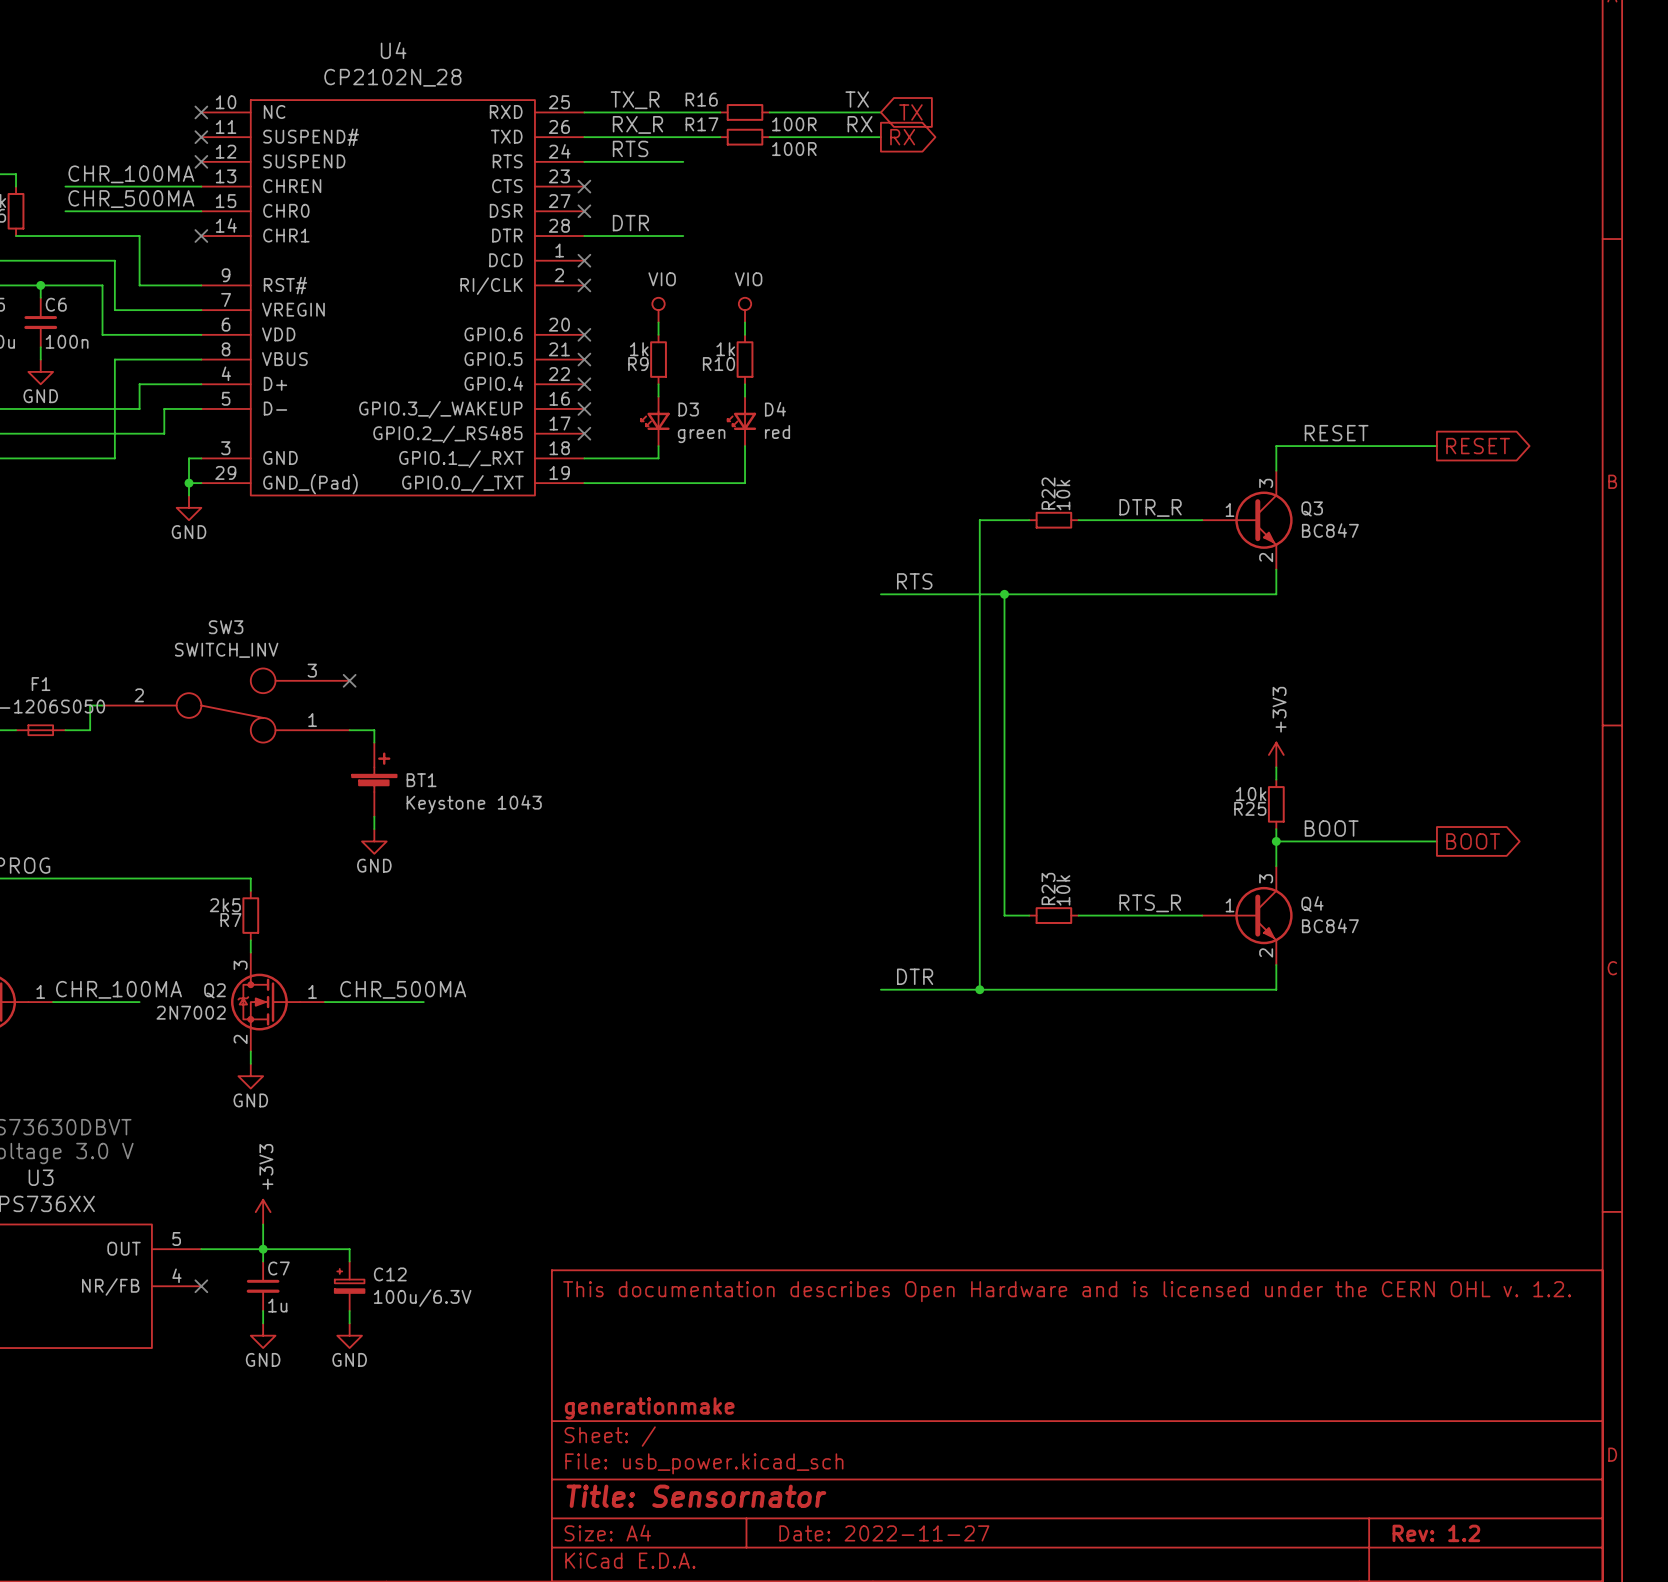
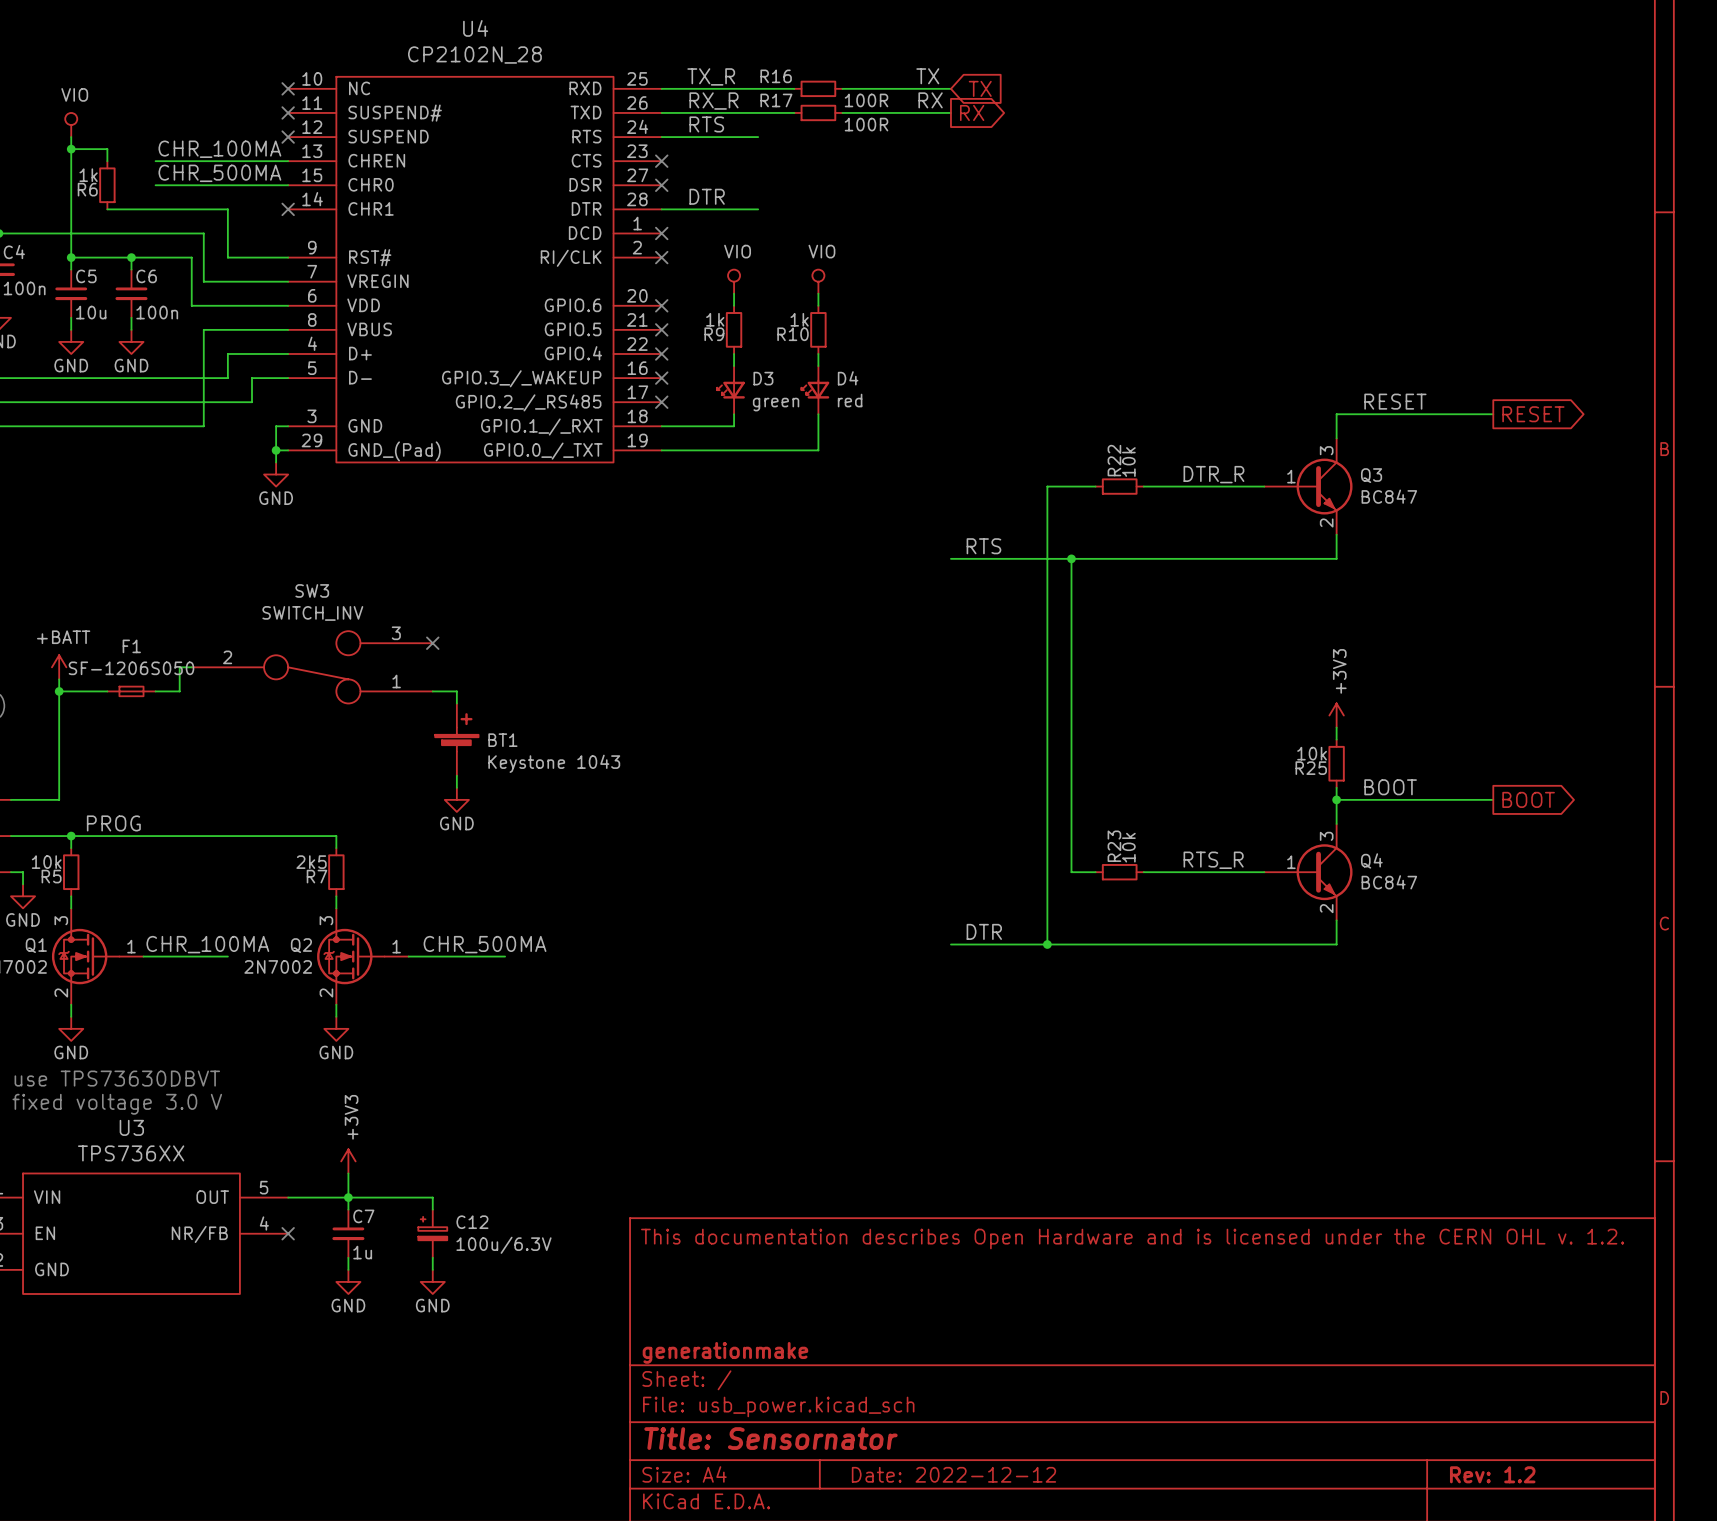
title block: Date: 2022-11-27 (884, 1533) -> Date: 2022-12-12 (953, 1474)

